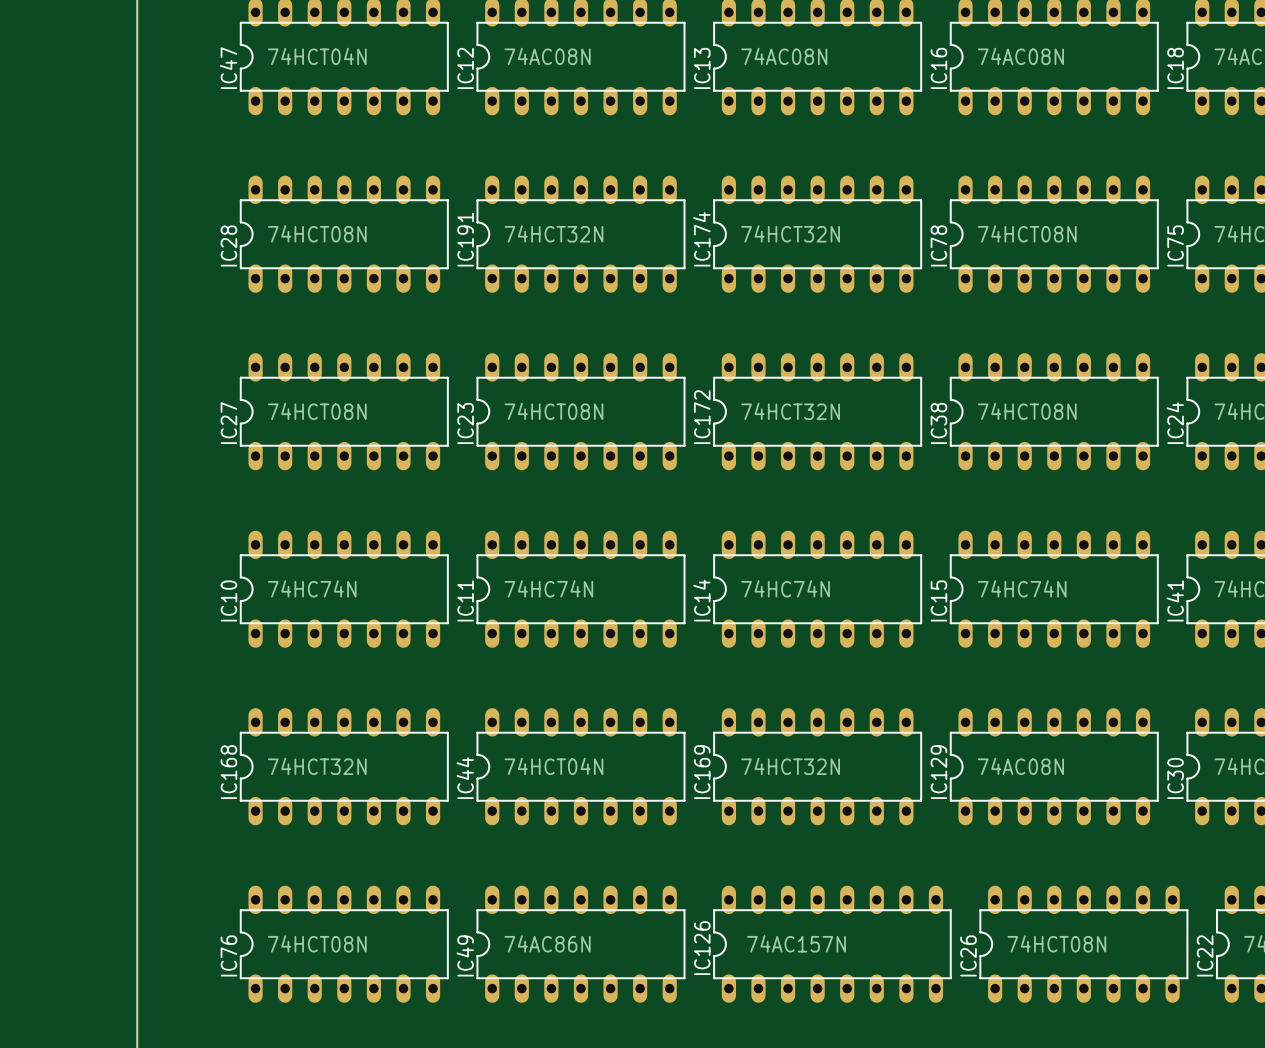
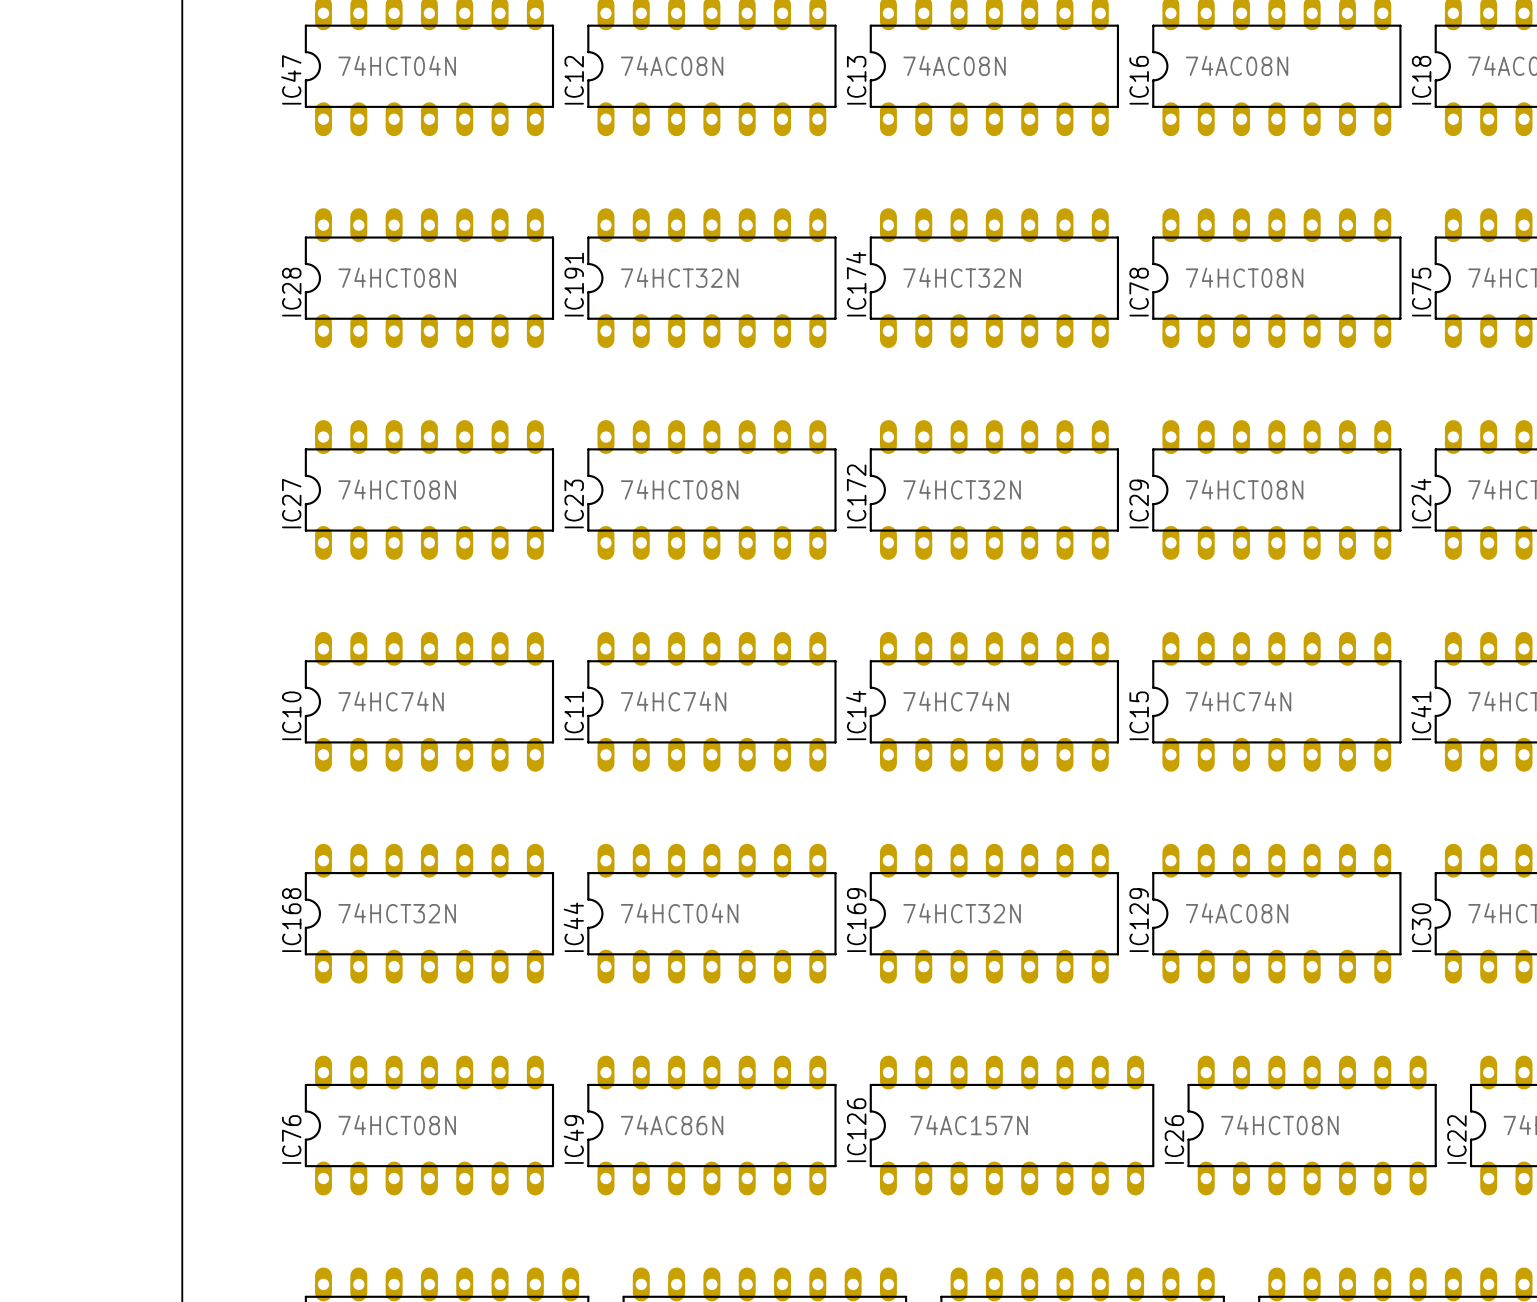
IC38 name: IC38 (938, 423) -> IC29 (1139, 503)

